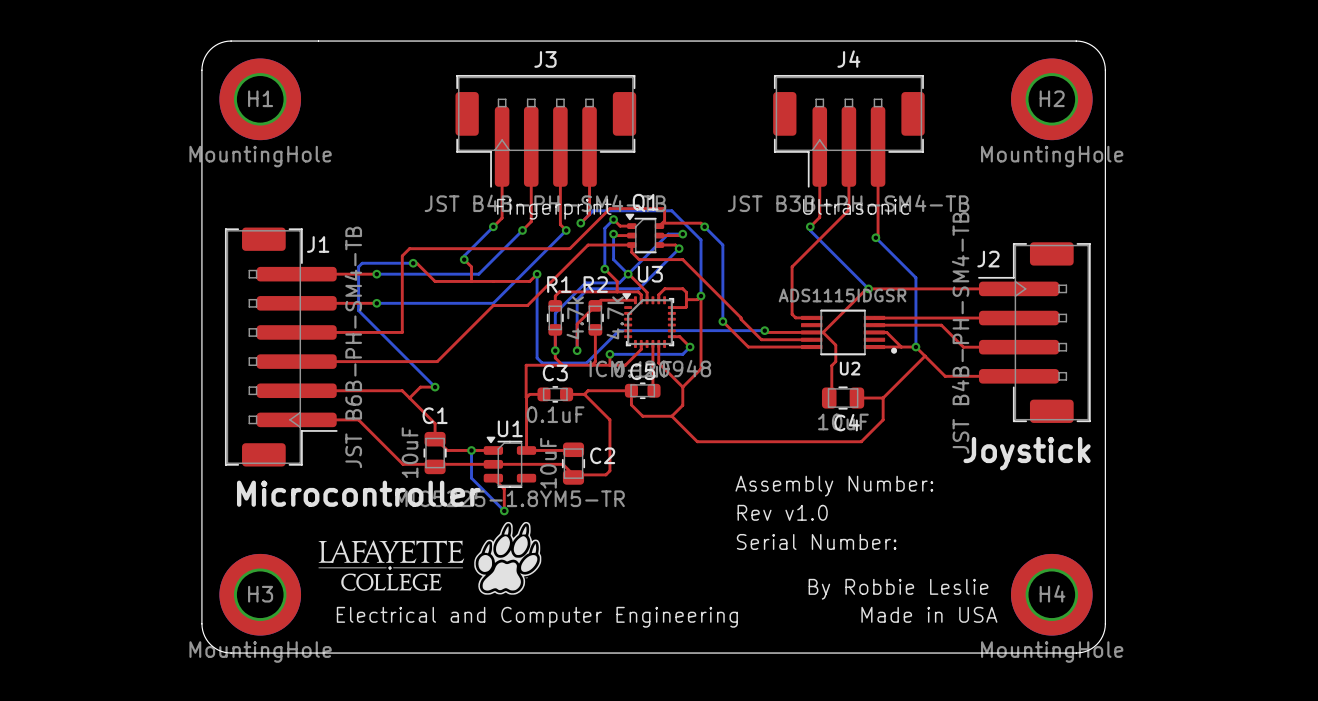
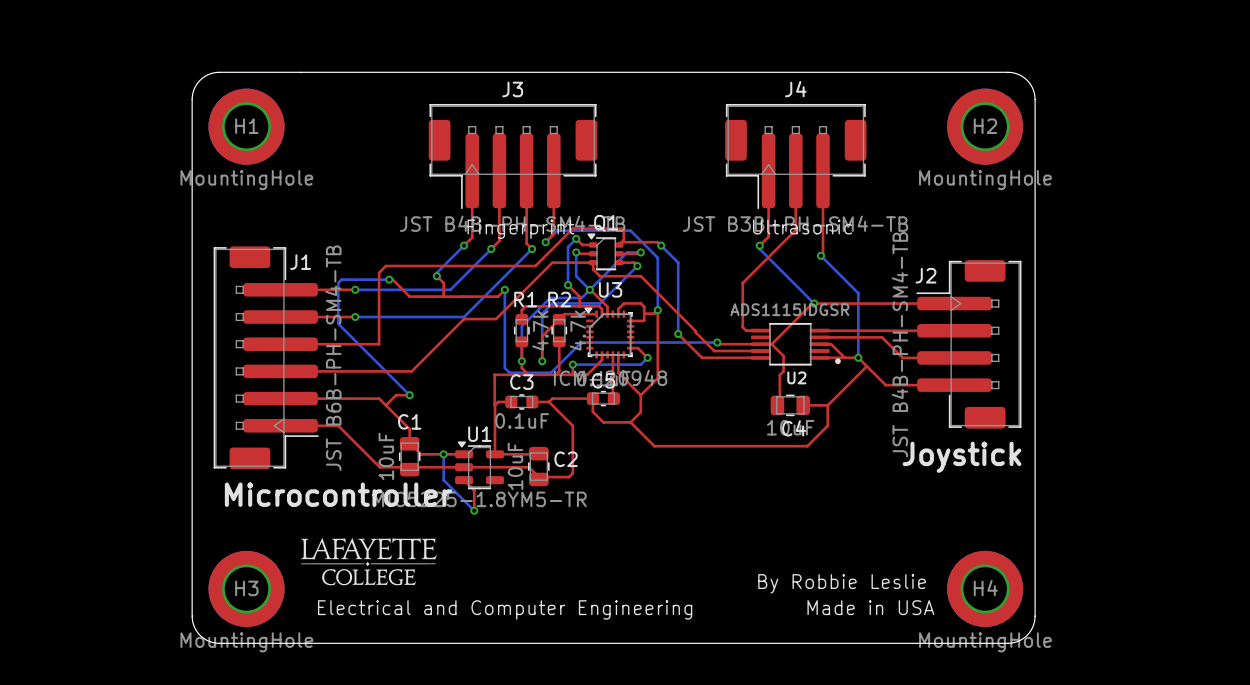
text: Assembly Number: (834, 486) -> none
text: Rev v1.0 (782, 512) -> none
drawing: [474, 521, 542, 595] -> none
text: Serial Number: (816, 541) -> none

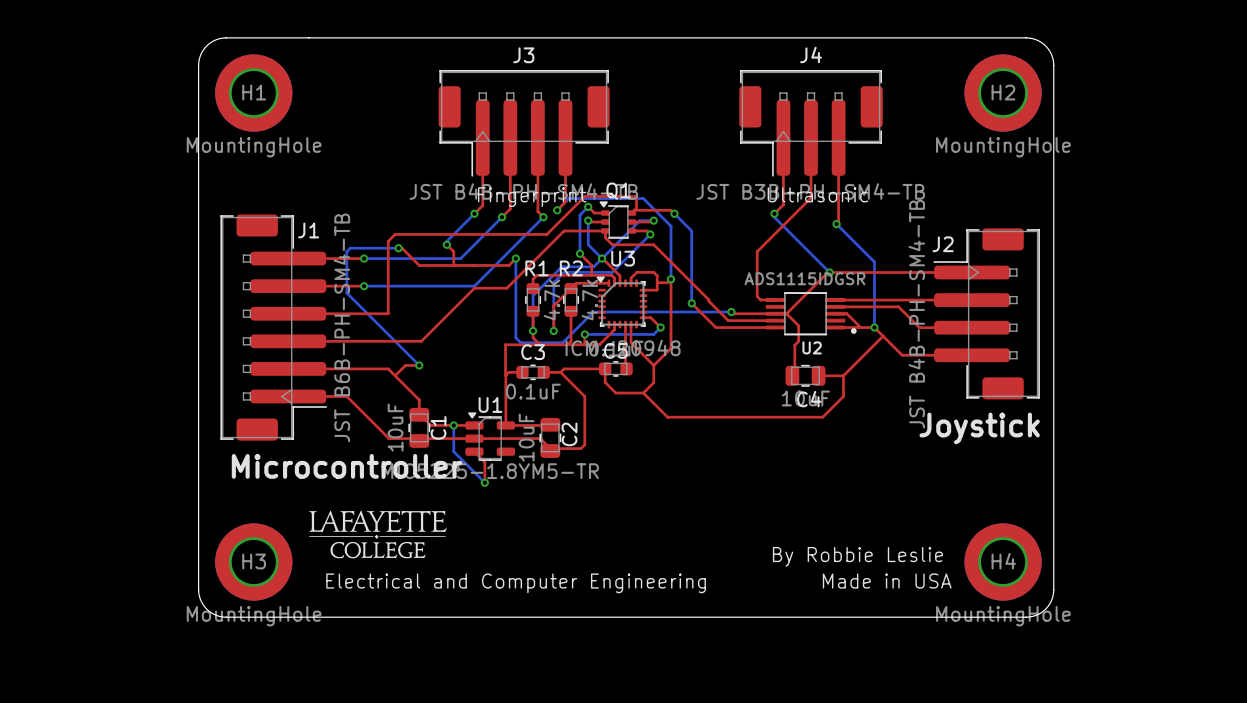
C1 name rotation: 0° (409, 421) -> 90° counterclockwise (438, 427)
C1 name position: C1 (409, 421) -> C1 (438, 427)
C2 name rotation: 0° (566, 459) -> 90° counterclockwise (569, 434)

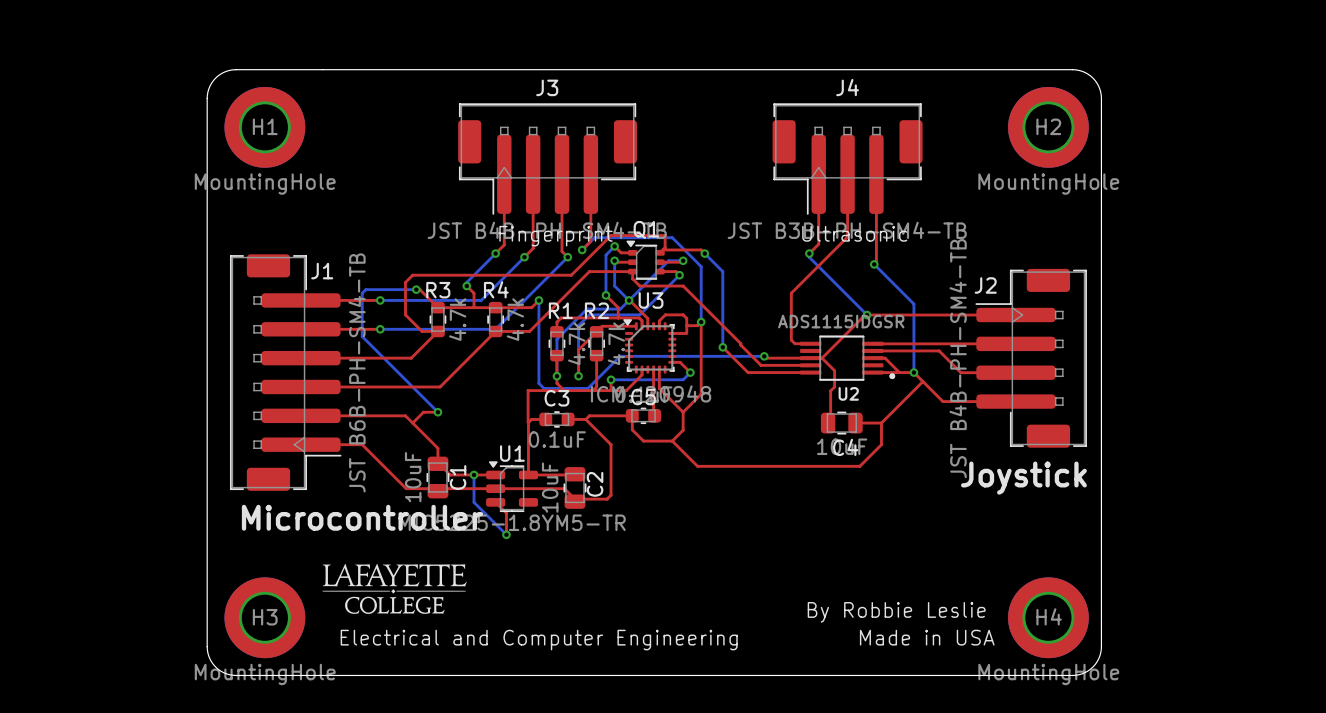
top track: (388, 272) (388, 313) -> (405, 314) (422, 331) (437, 331) (411, 358) (405, 358)
R3: none -> 4.7k (437, 319)
R4: none -> 4.7k (495, 319)

